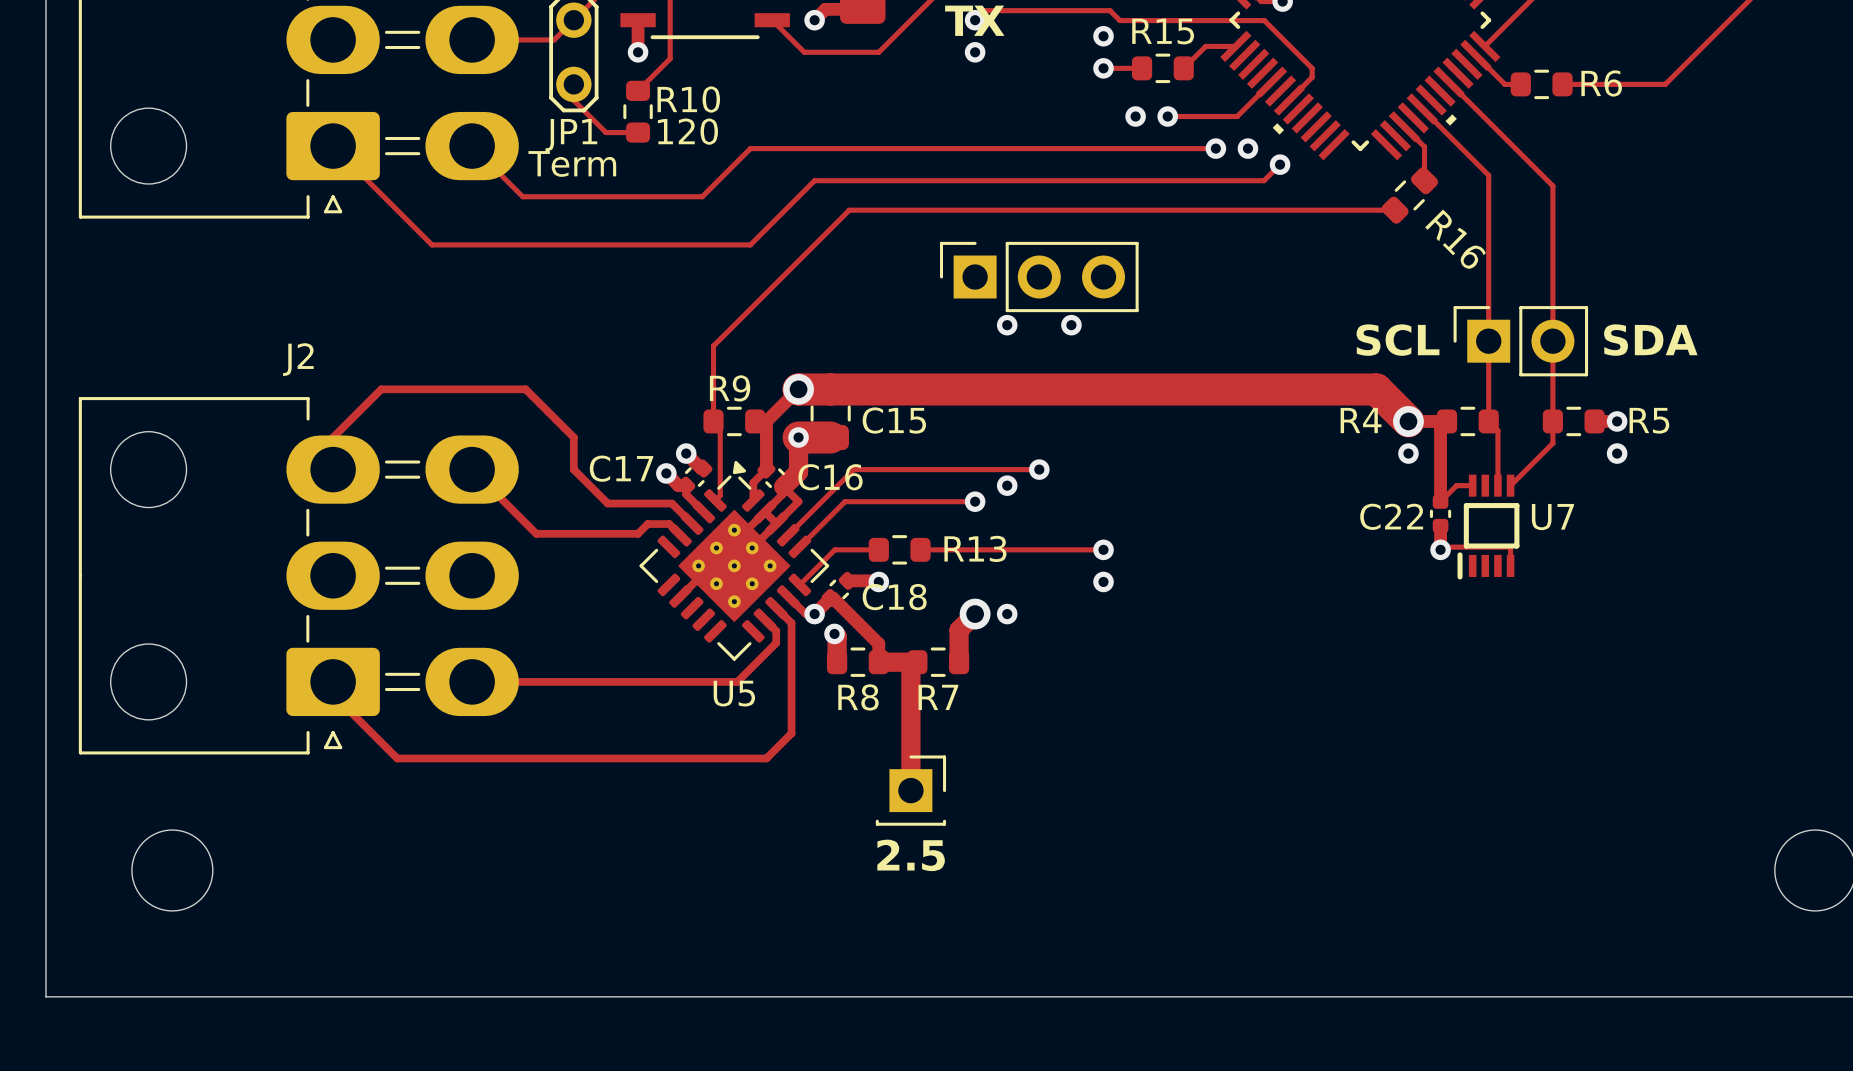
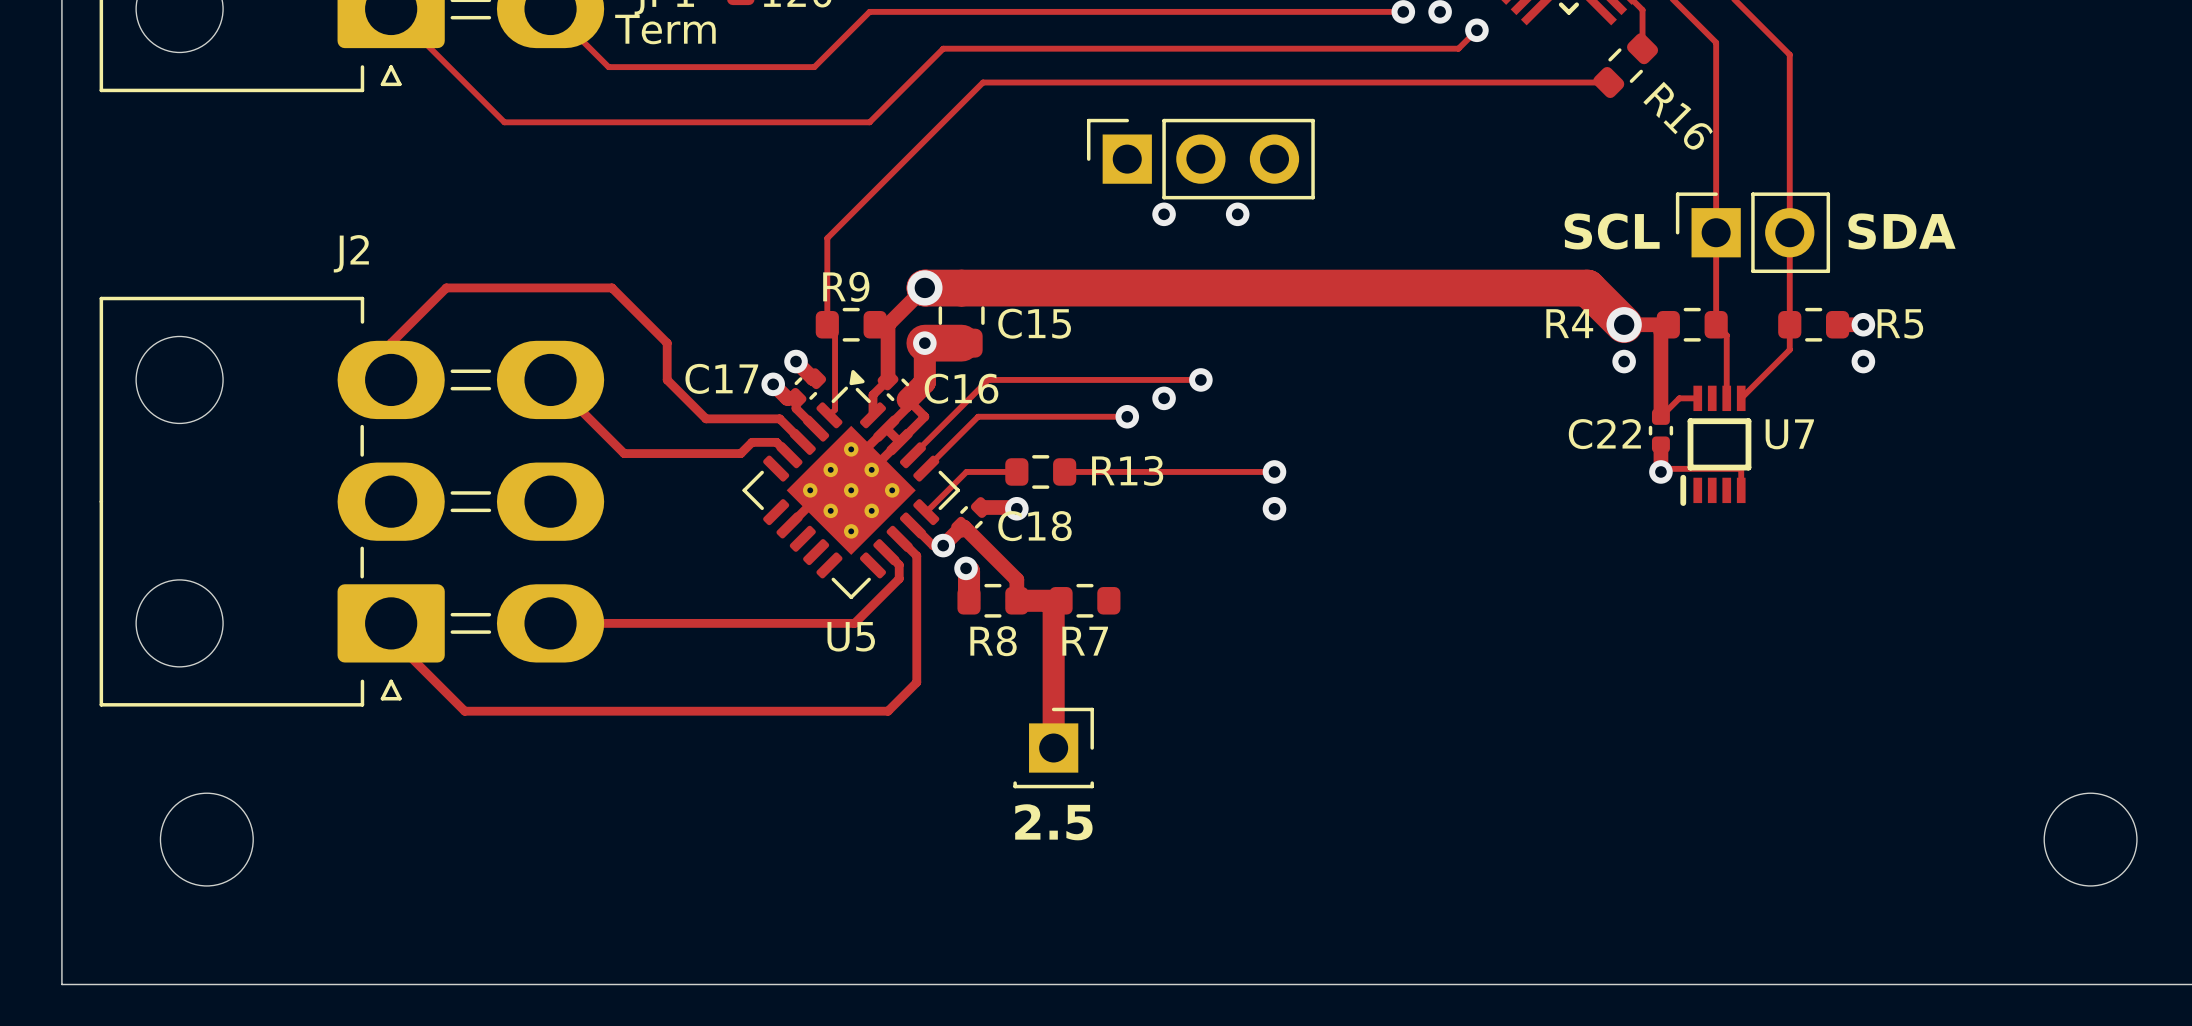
track: (975, 614) (959, 630) (959, 662) -> none
via: (975, 614) -> none
via: (1007, 614) -> none

